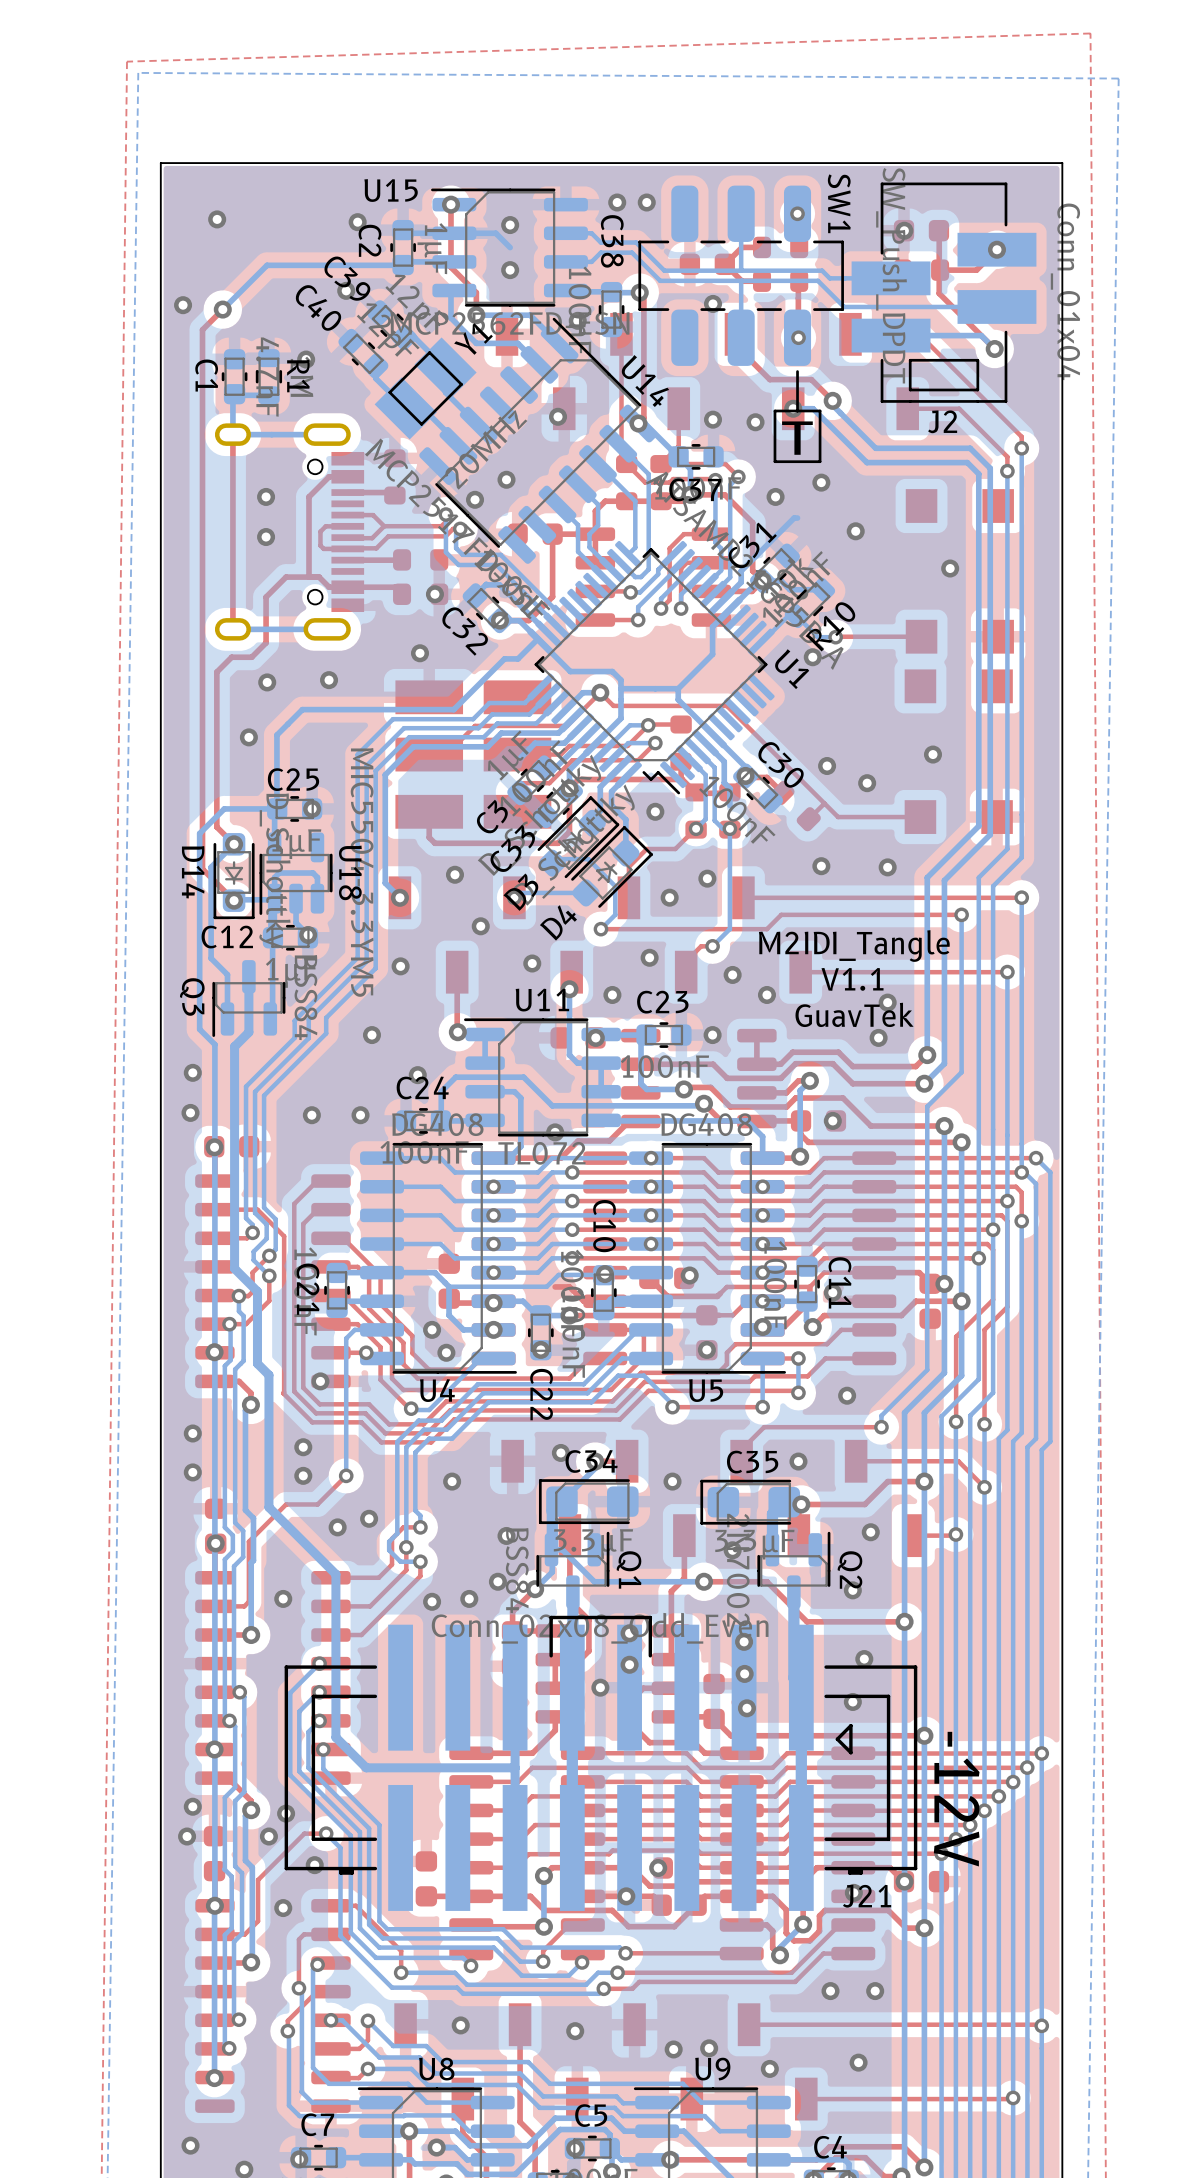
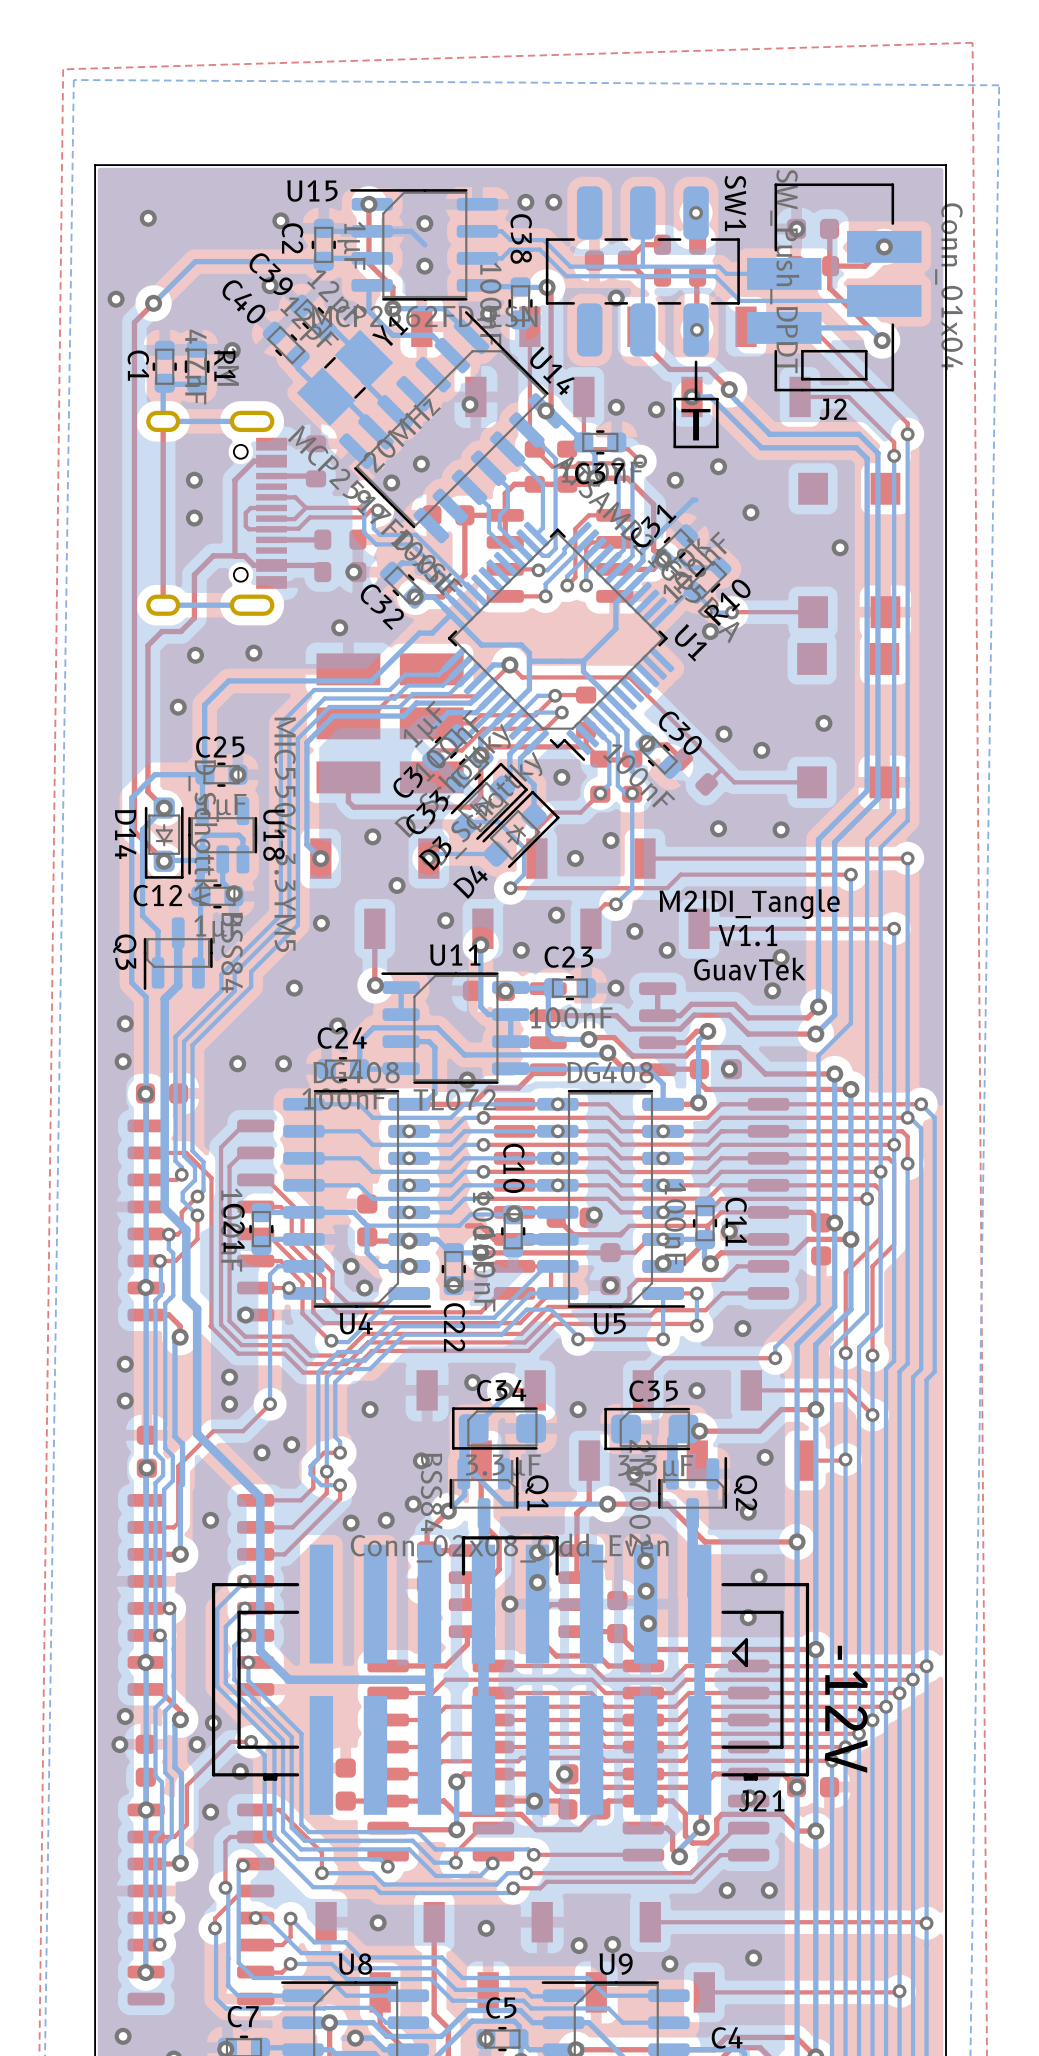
Y1 footprint: [374, 337, 477, 440] -> [296, 329, 394, 426]

